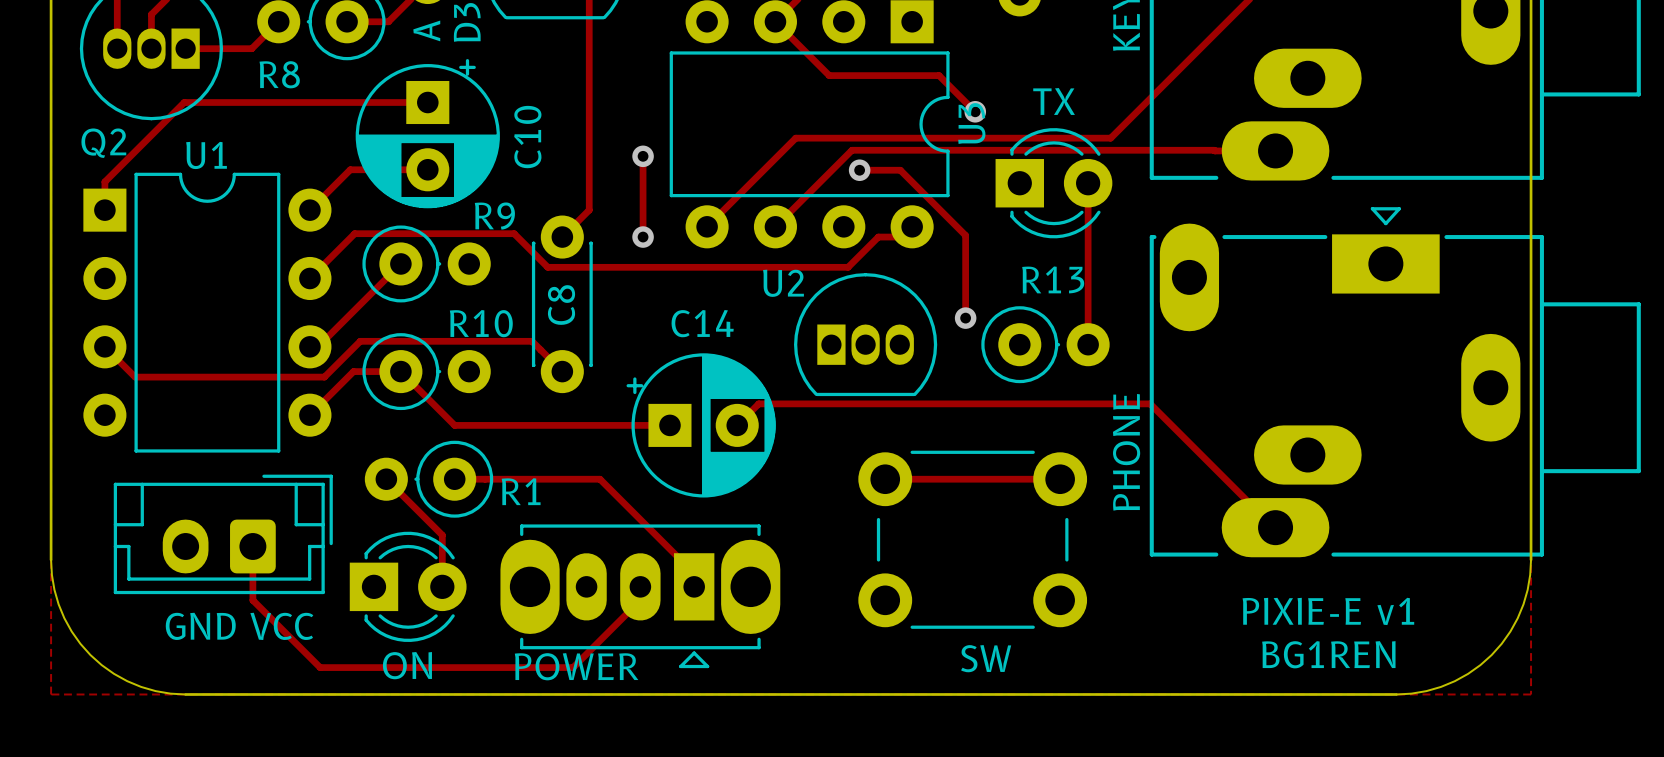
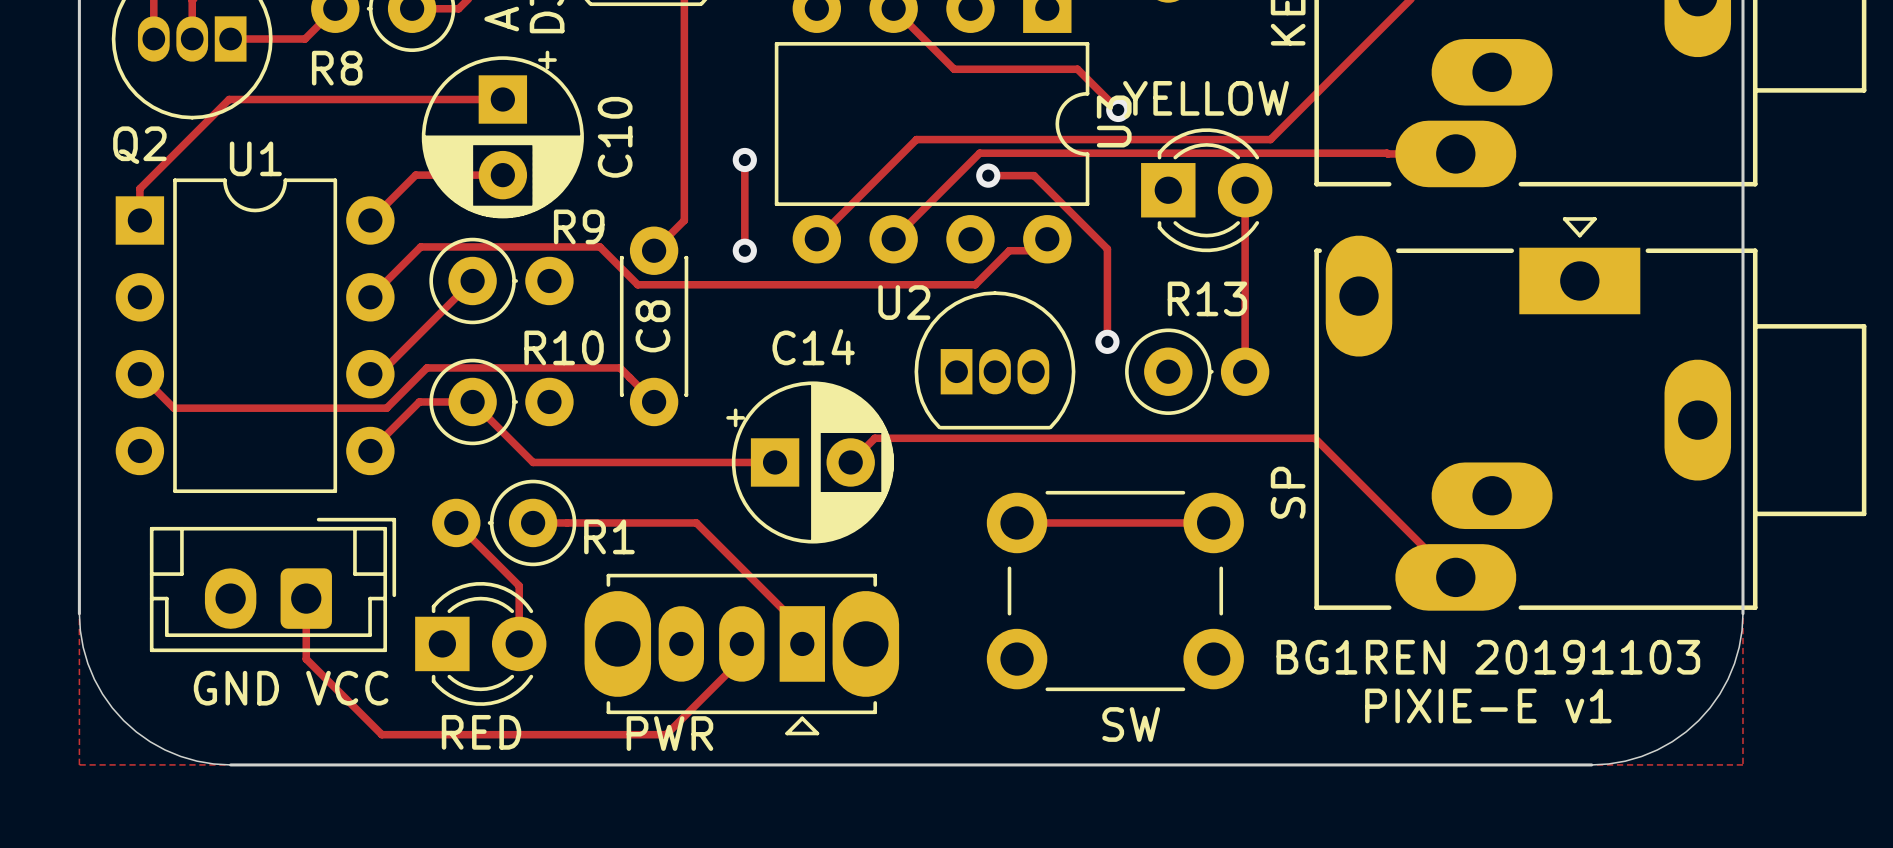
part value: TX (1054, 101) -> YELLOW (1205, 98)
part value: PHONE (1126, 452) -> SP (1288, 492)
text: none -> BG1REN 20191103 (1488, 657)
text position: PIXIE-E v1 (1328, 611) -> PIXIE-E v1 (1488, 705)
text: BG1REN (1328, 654) -> none
part value: ON (407, 665) -> RED (481, 732)
part value: POWER (576, 666) -> PWR (669, 733)

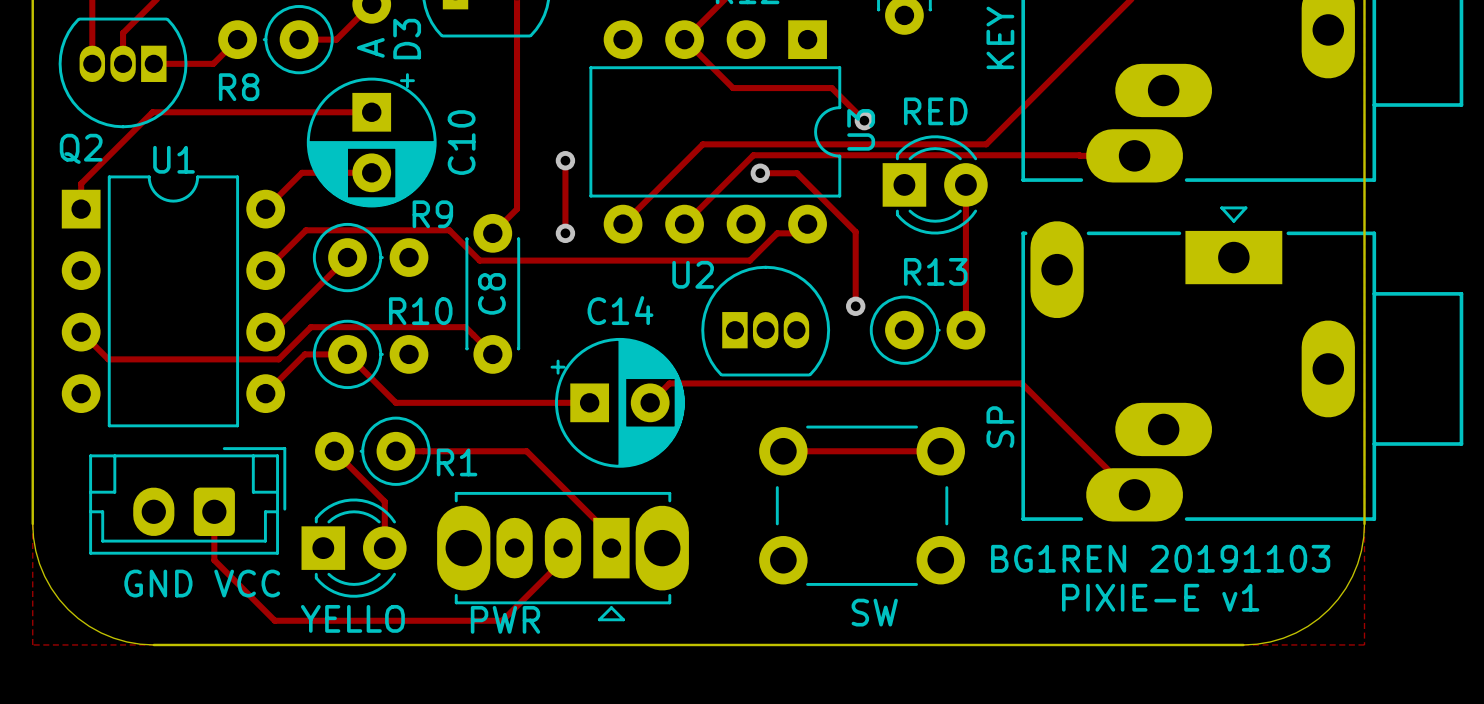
part value: YELLOW (1205, 98) -> RED (935, 111)
part value: RED (481, 732) -> YELLO (352, 618)

